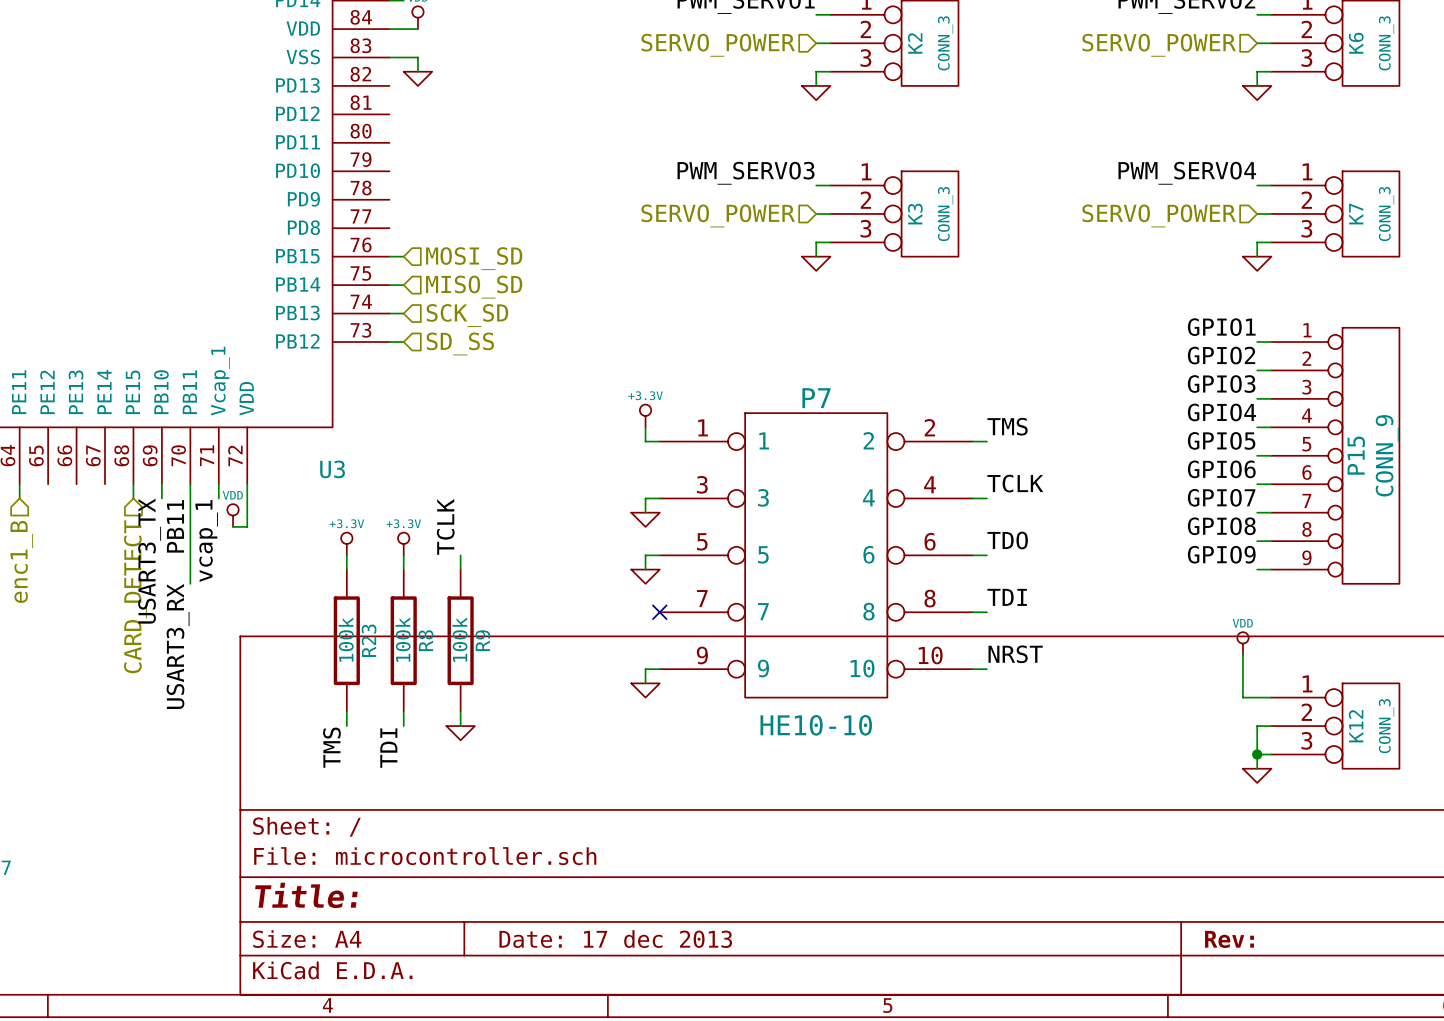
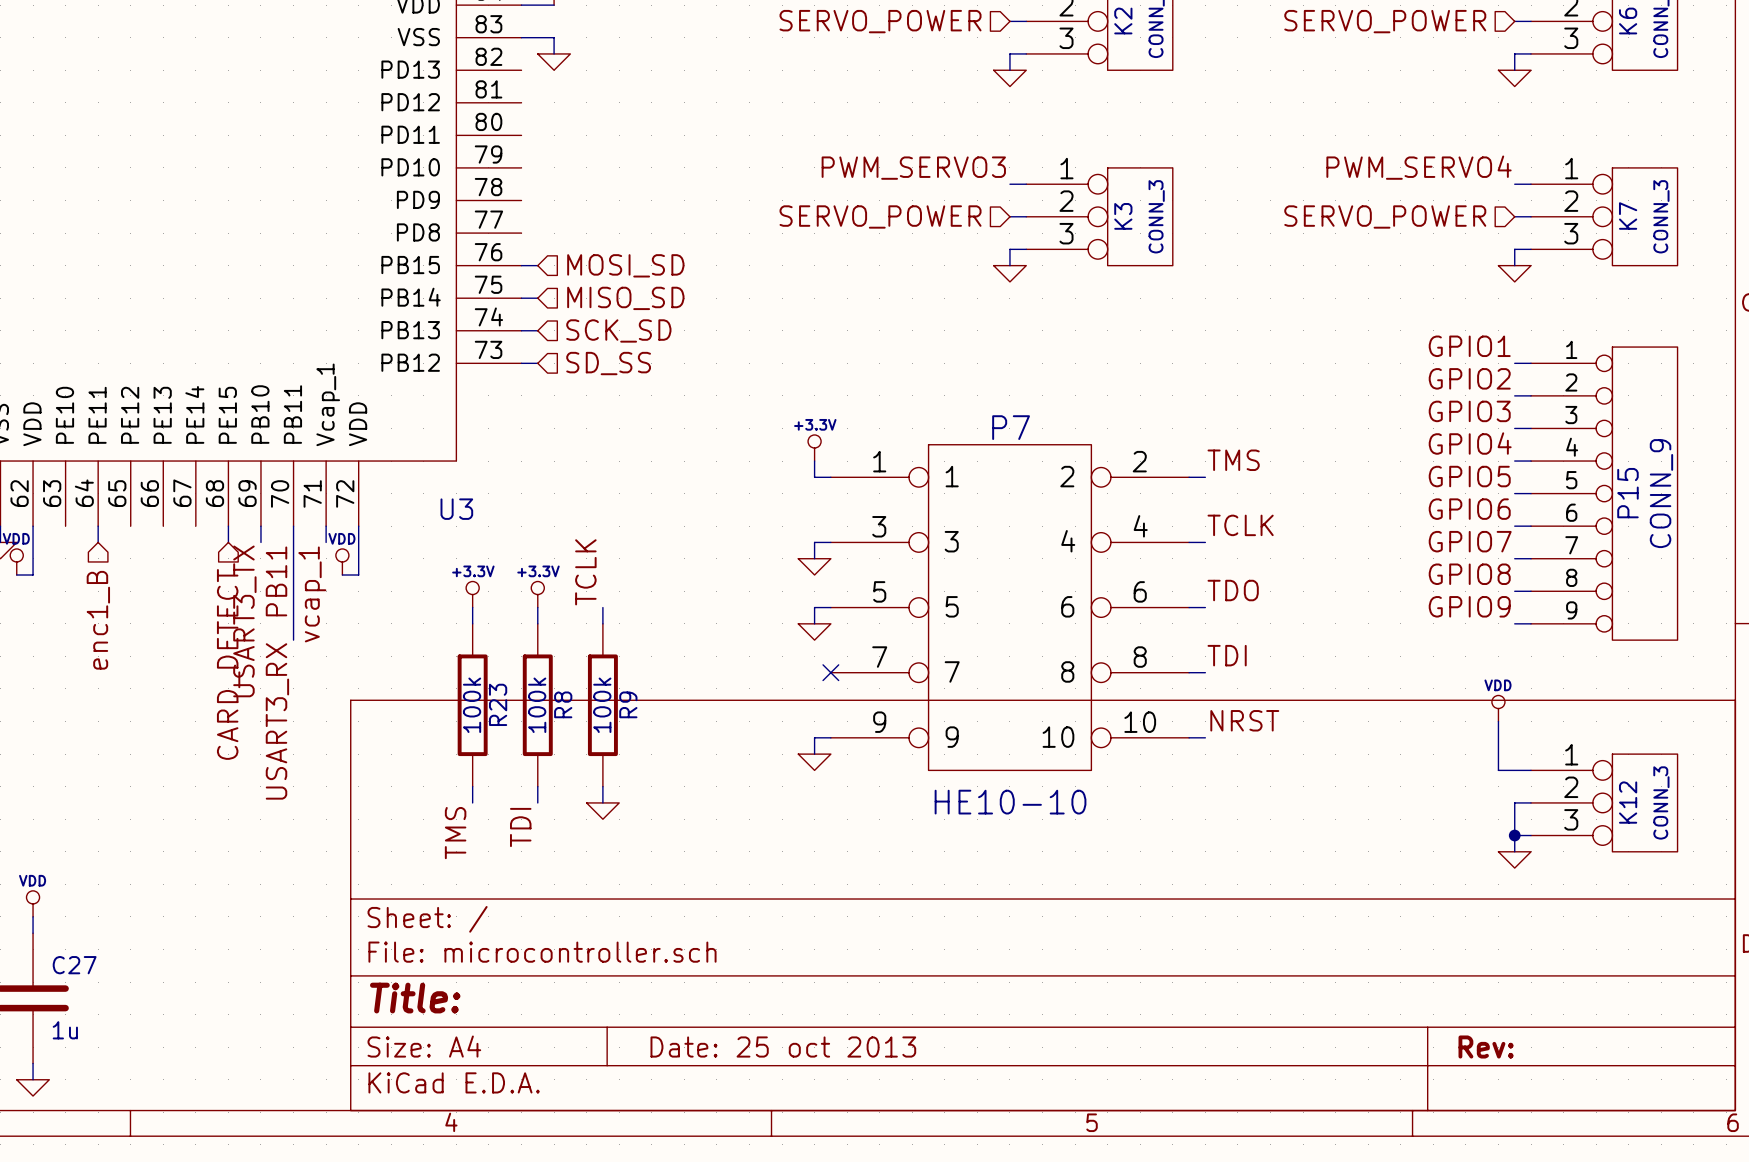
title block: Date: 17 dec 2013 (615, 939) -> Date: 25 oct 2013 (783, 1047)

